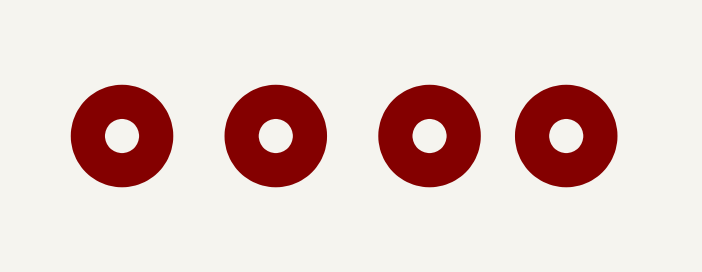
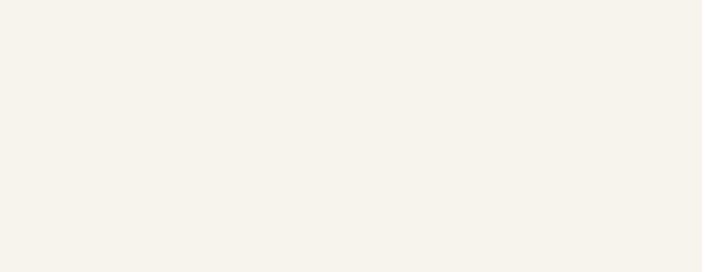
part: (122, 136) -> none
part: (275, 136) -> none
part: (429, 136) -> none
part: (566, 136) -> none

